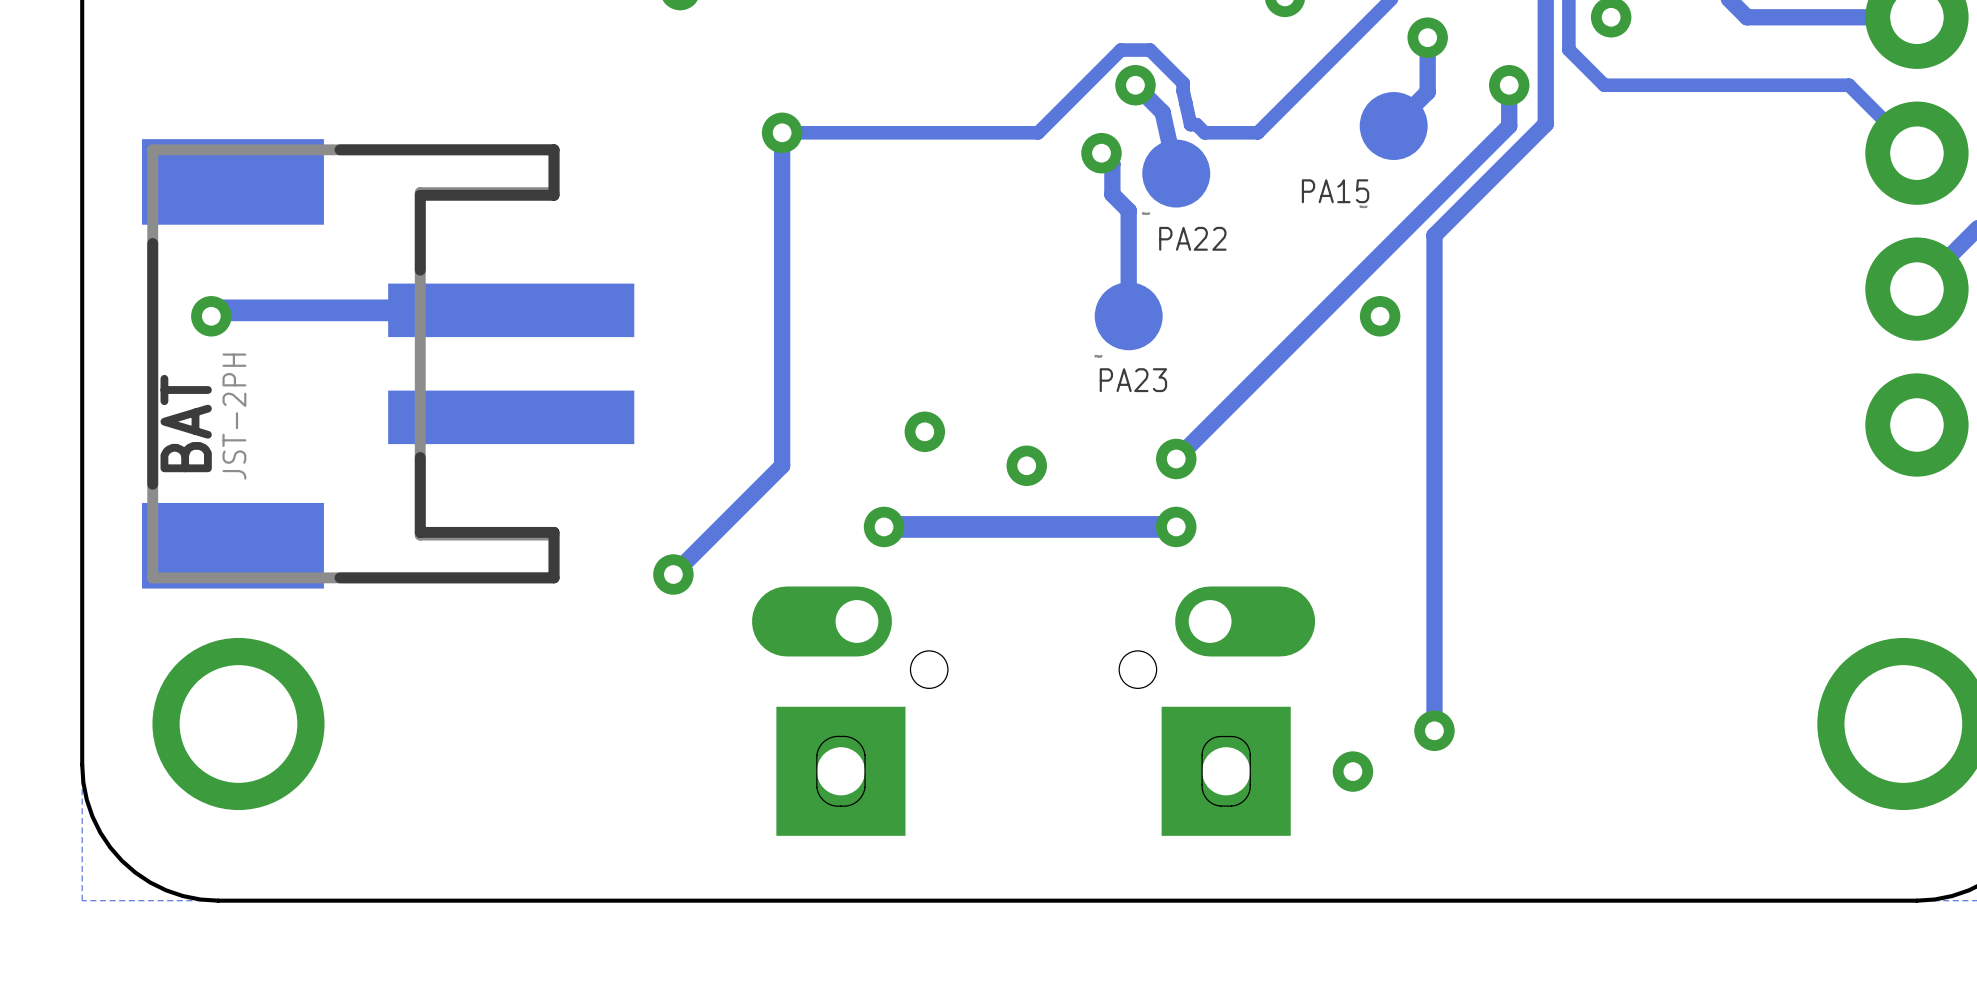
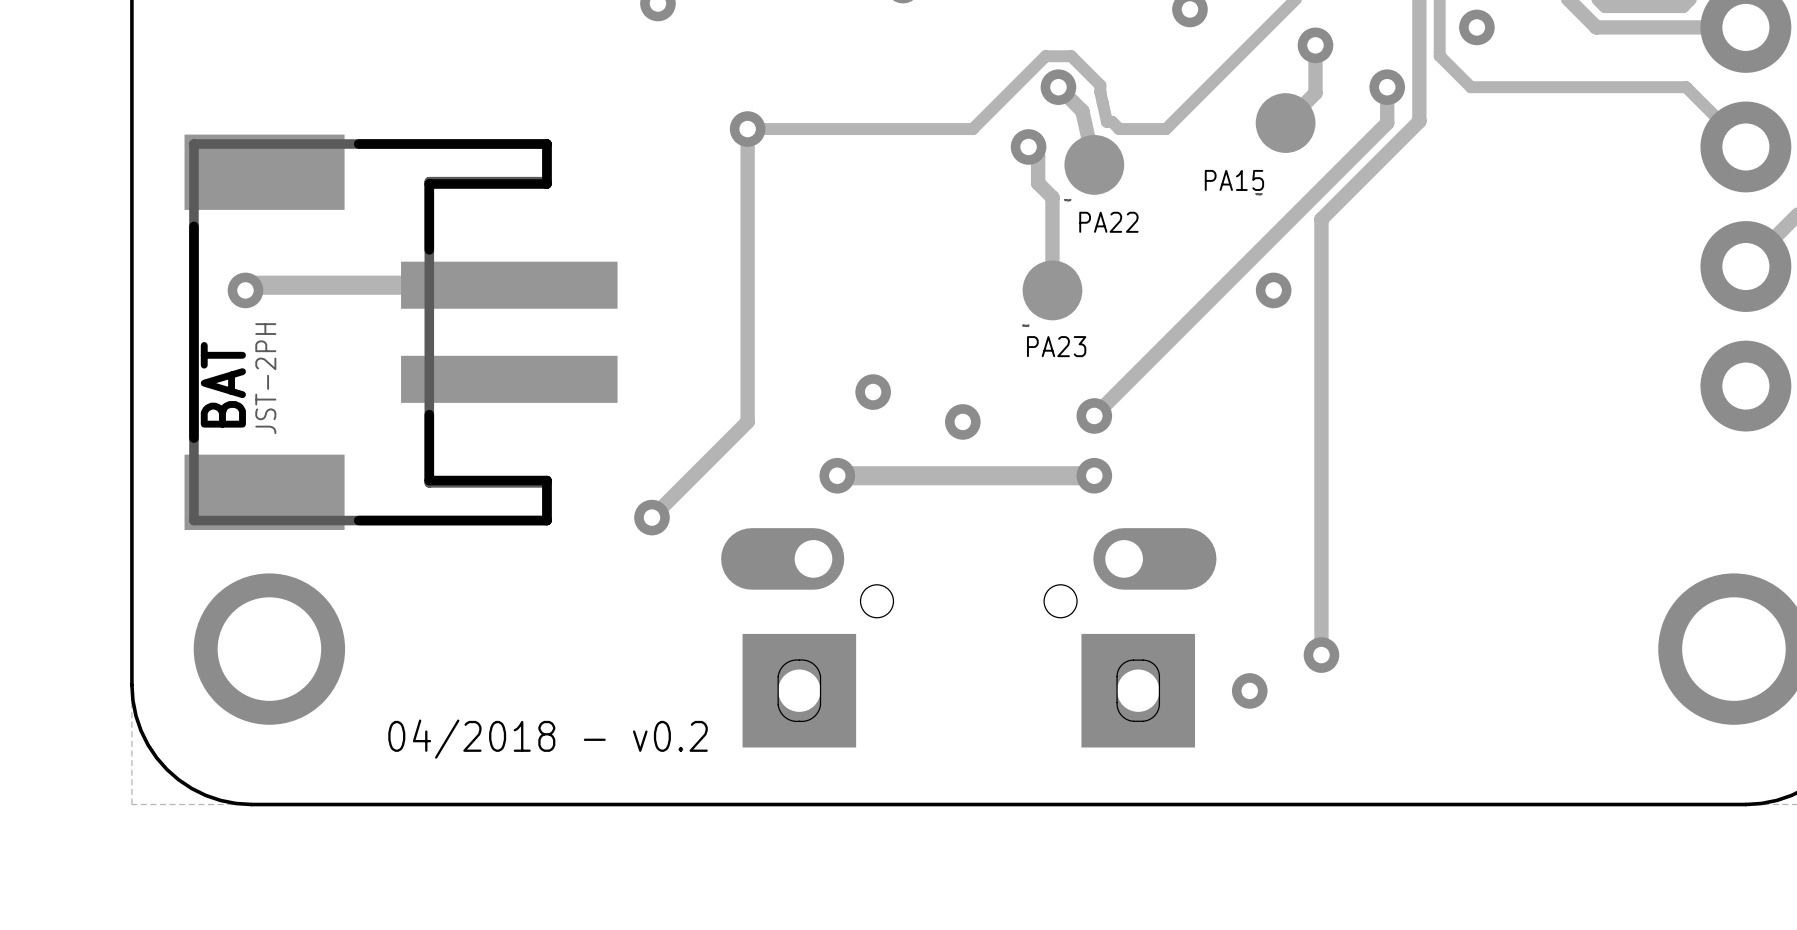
text: none -> 04/2018 - v0.2 (548, 739)

